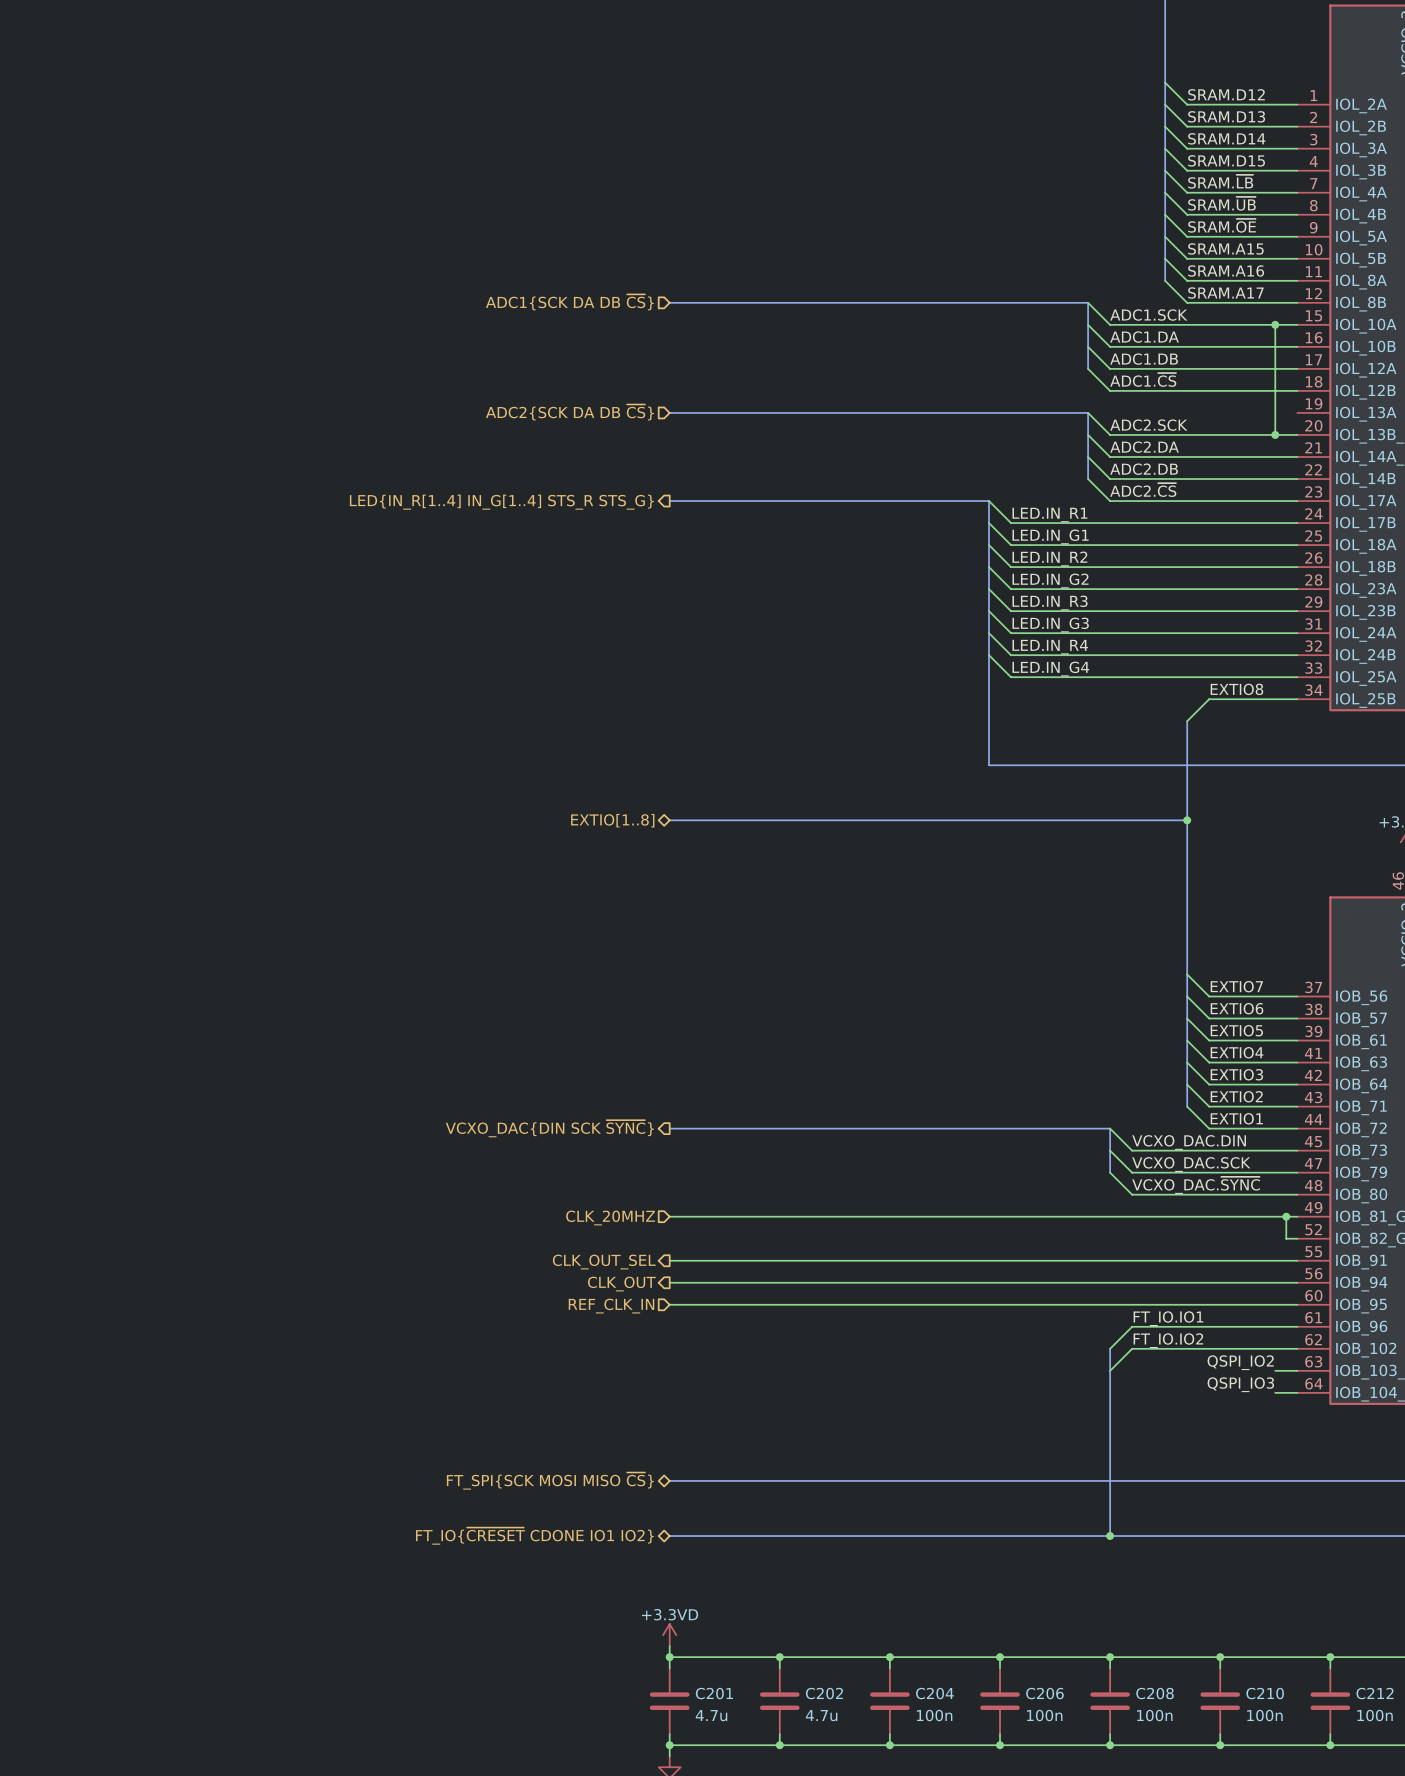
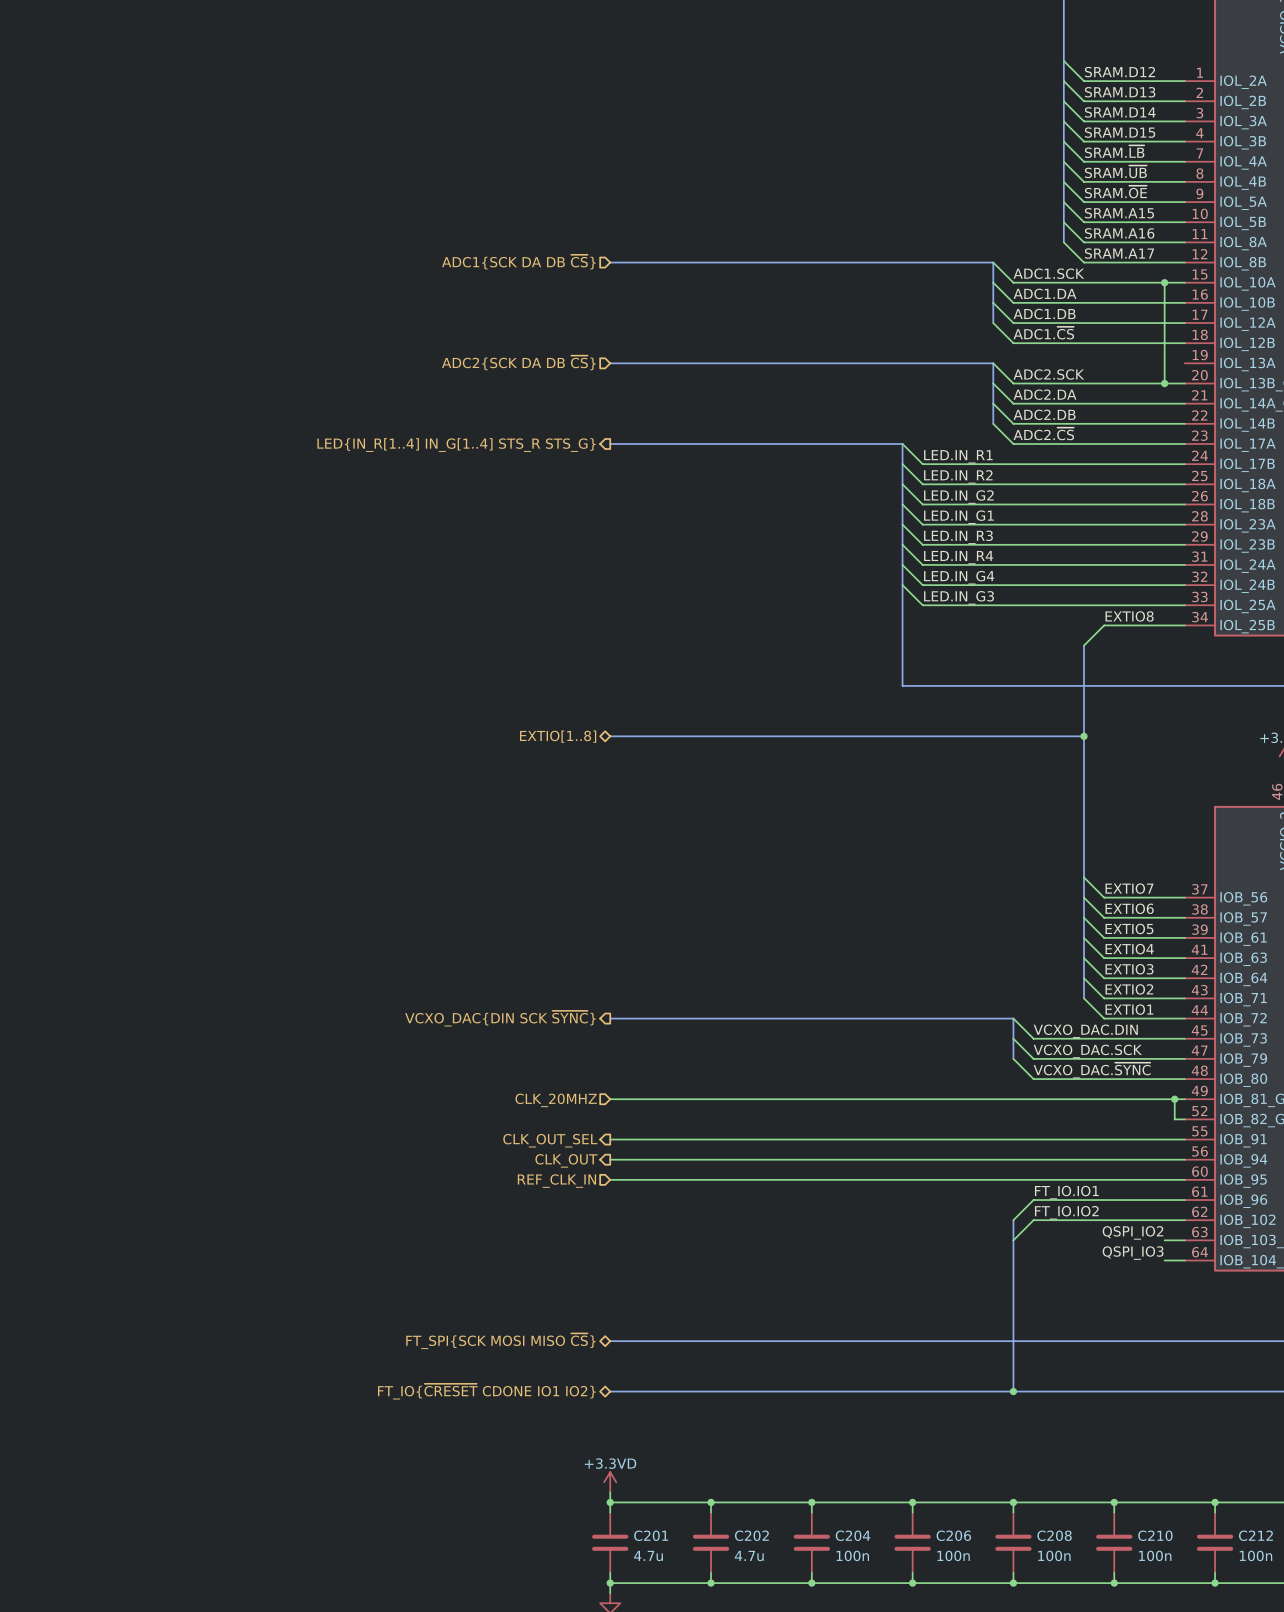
label: LED.IN_G1 (1050, 536) -> LED.IN_R2 (958, 476)
label: LED.IN_R2 (1049, 558) -> LED.IN_G2 (958, 497)
label: LED.IN_G2 (1050, 580) -> LED.IN_G1 (958, 517)
label: LED.IN_G3 (1050, 625) -> LED.IN_R4 (958, 557)
label: LED.IN_R4 (1050, 647) -> LED.IN_G4 (959, 577)
label: LED.IN_G4 (1050, 669) -> LED.IN_G3 (959, 597)

